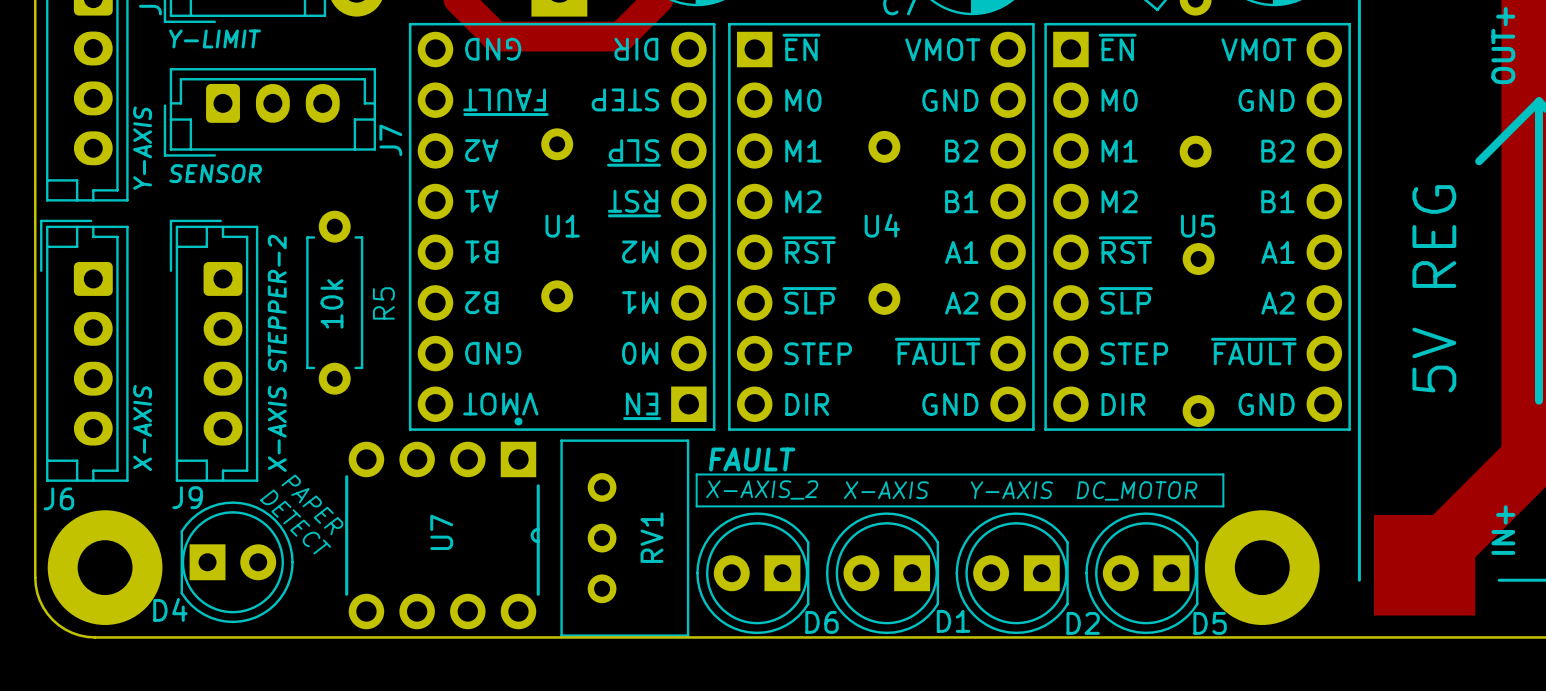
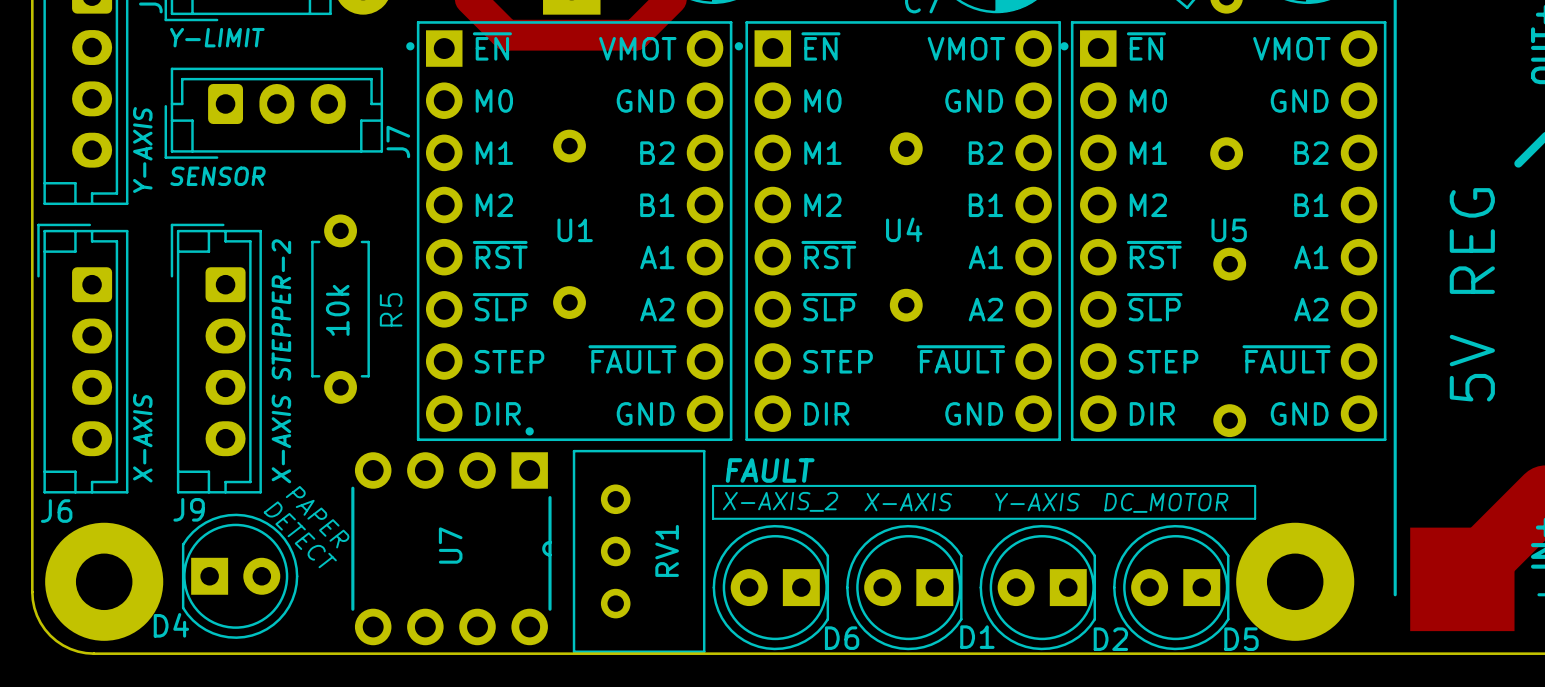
U1 footprint: [408, 22, 716, 431] -> [406, 21, 733, 442]
U4 footprint: [728, 22, 1035, 431] -> [734, 21, 1061, 442]
U5 footprint: [1044, 22, 1351, 431] -> [1060, 21, 1387, 442]

